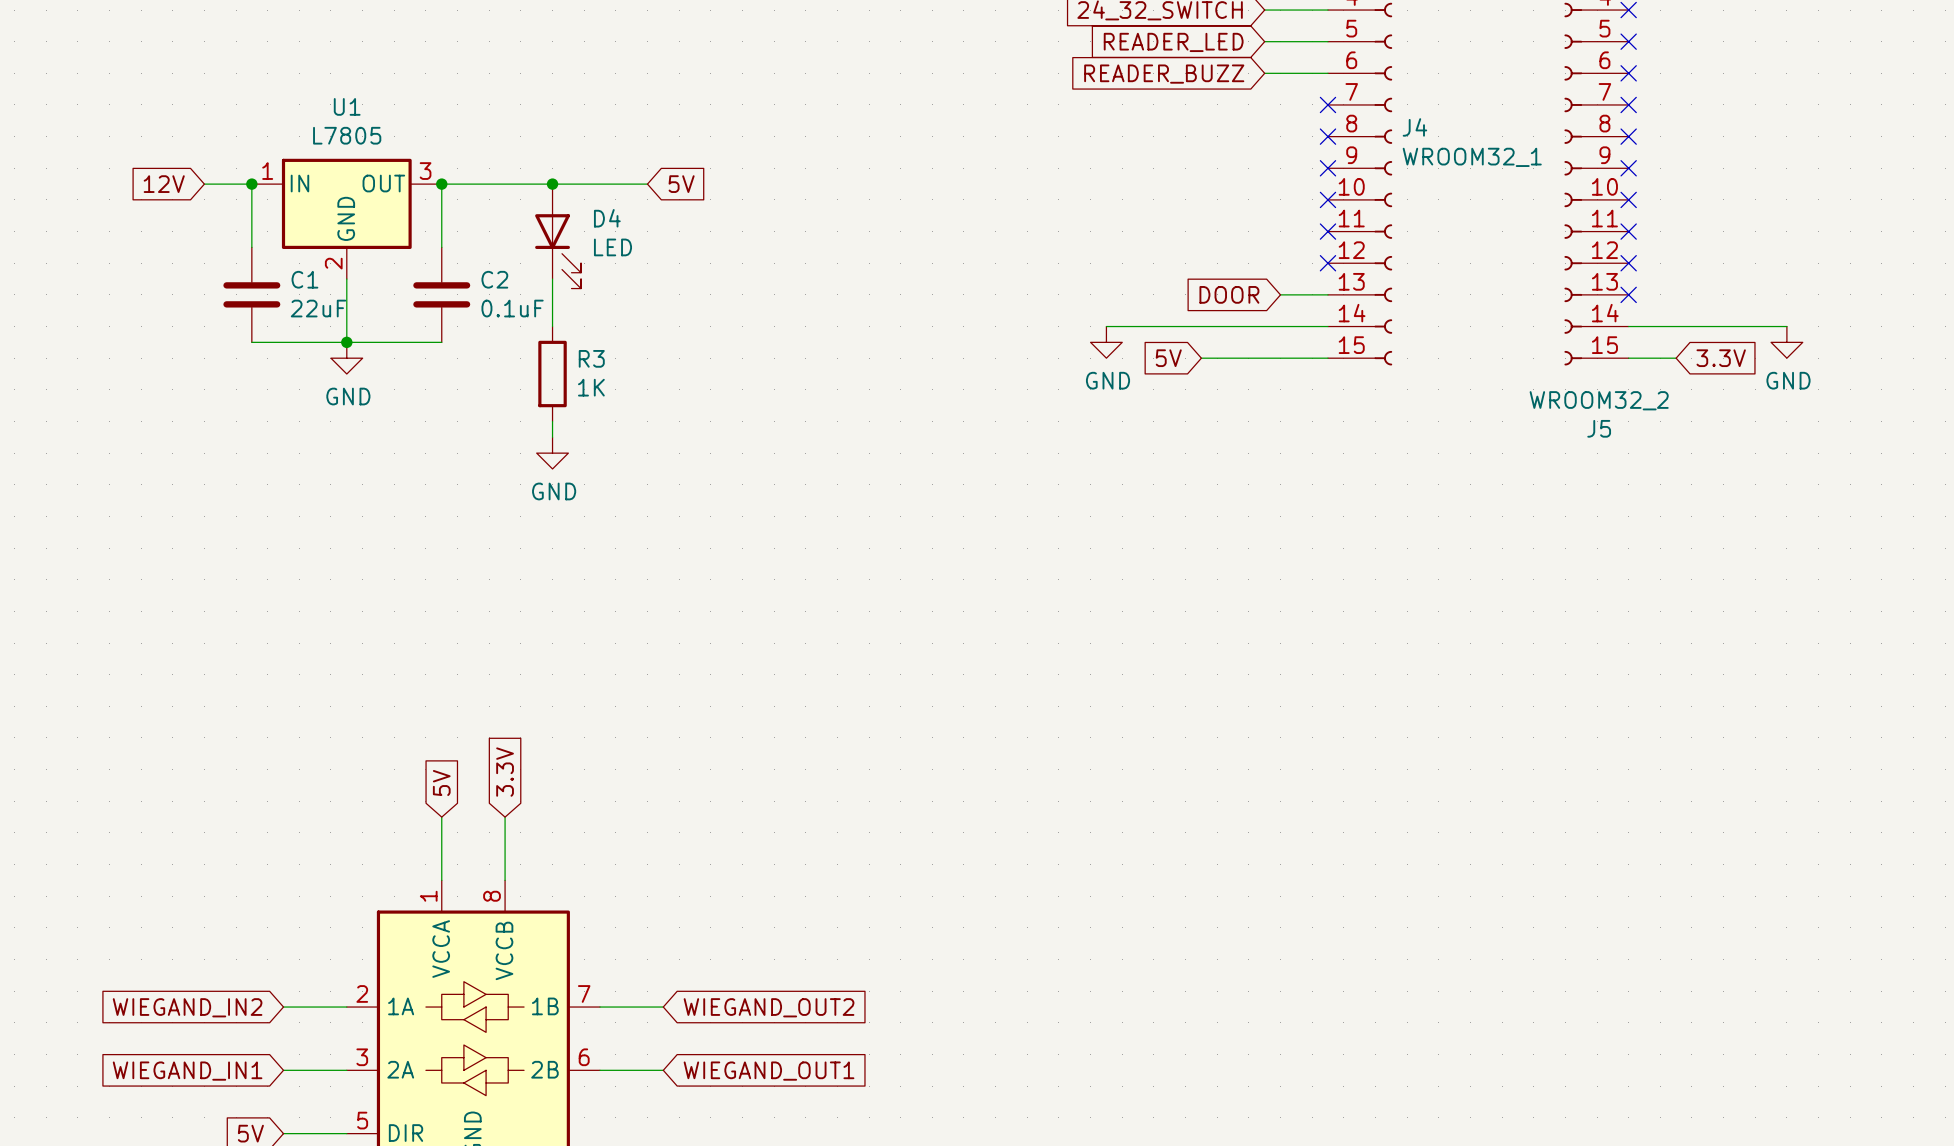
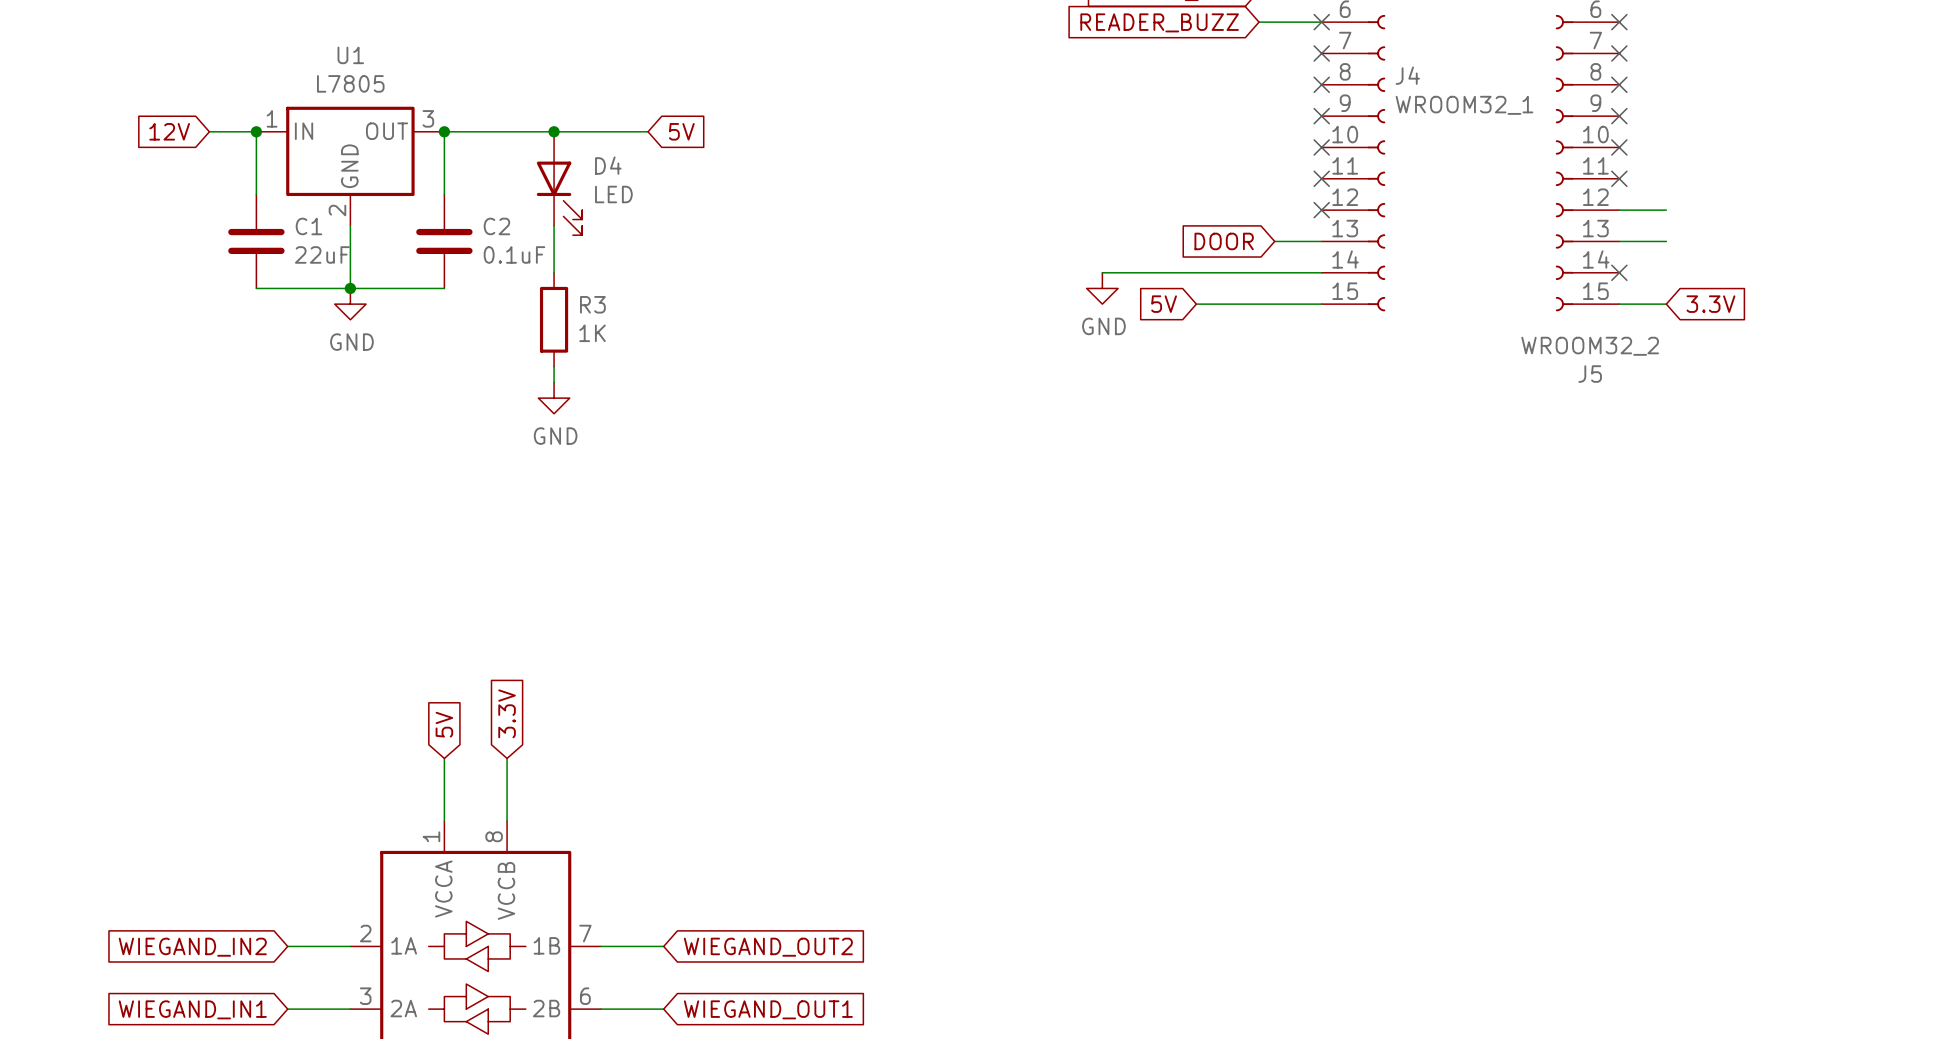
no-connect mark: none -> (1321, 22)
wire: none -> (1619, 210) (1666, 210)
no-connect mark: (1628, 263) -> none
wire: none -> (1619, 241) (1666, 241)
no-connect mark: (1628, 294) -> none
wire: (1628, 326) (1786, 326) -> none
no-connect mark: none -> (1619, 272)
power symbol: GND (1786, 342) -> none

